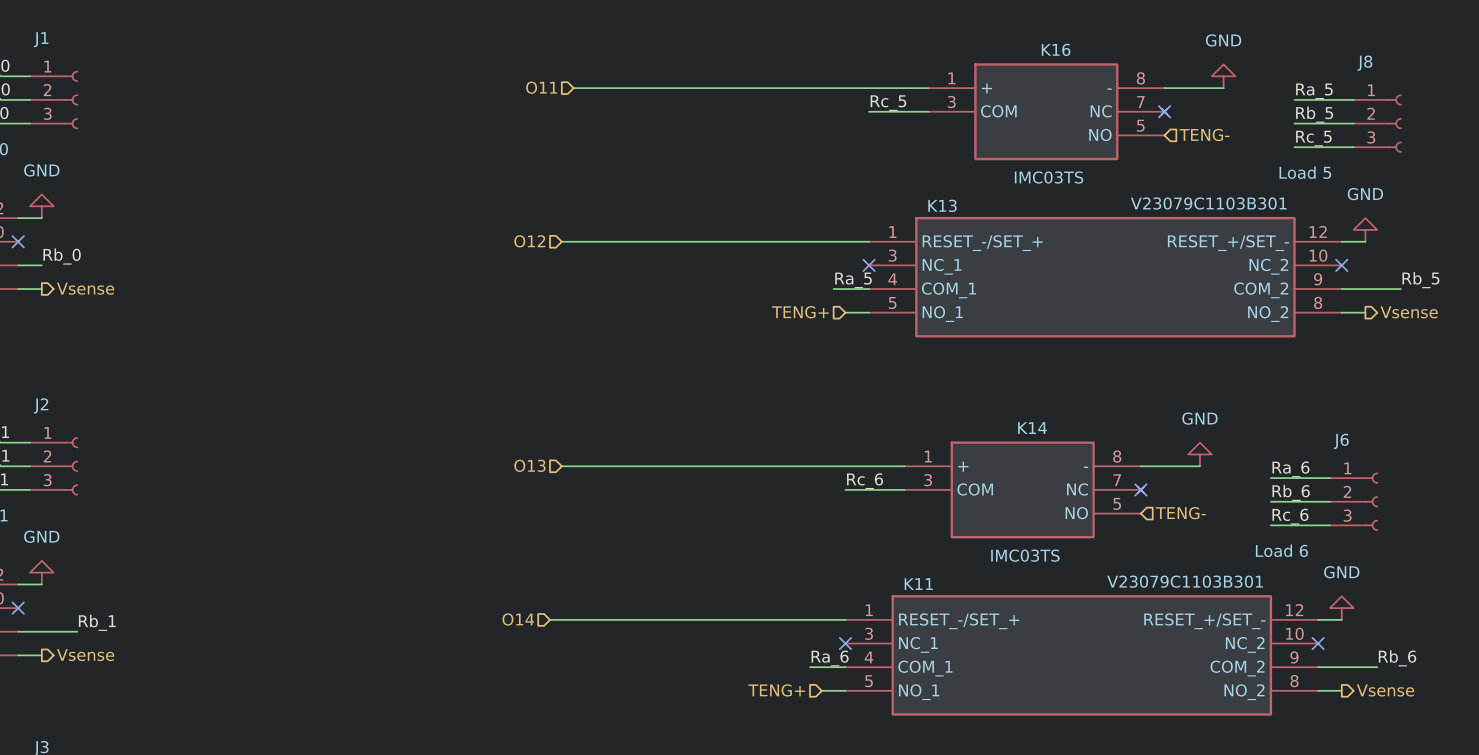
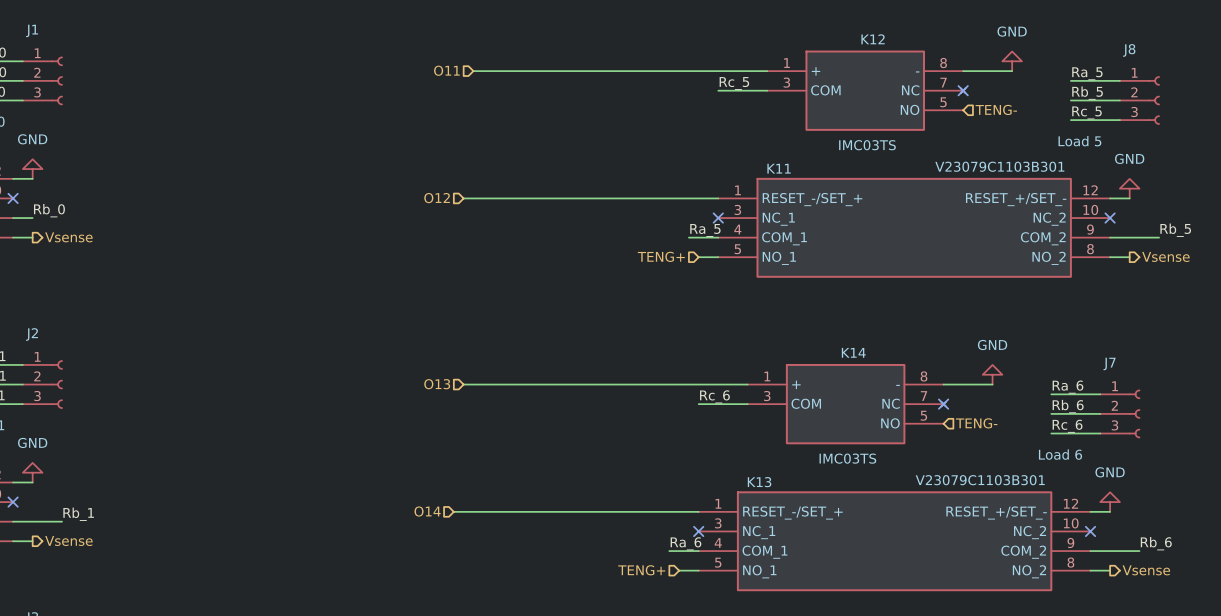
K16 name: K16 (1056, 49) -> K12 (873, 39)
K13 name: K13 (942, 205) -> K11 (779, 168)
J6 name: J6 (1341, 441) -> J7 (1109, 363)
K11 name: K11 (918, 584) -> K13 (759, 482)

